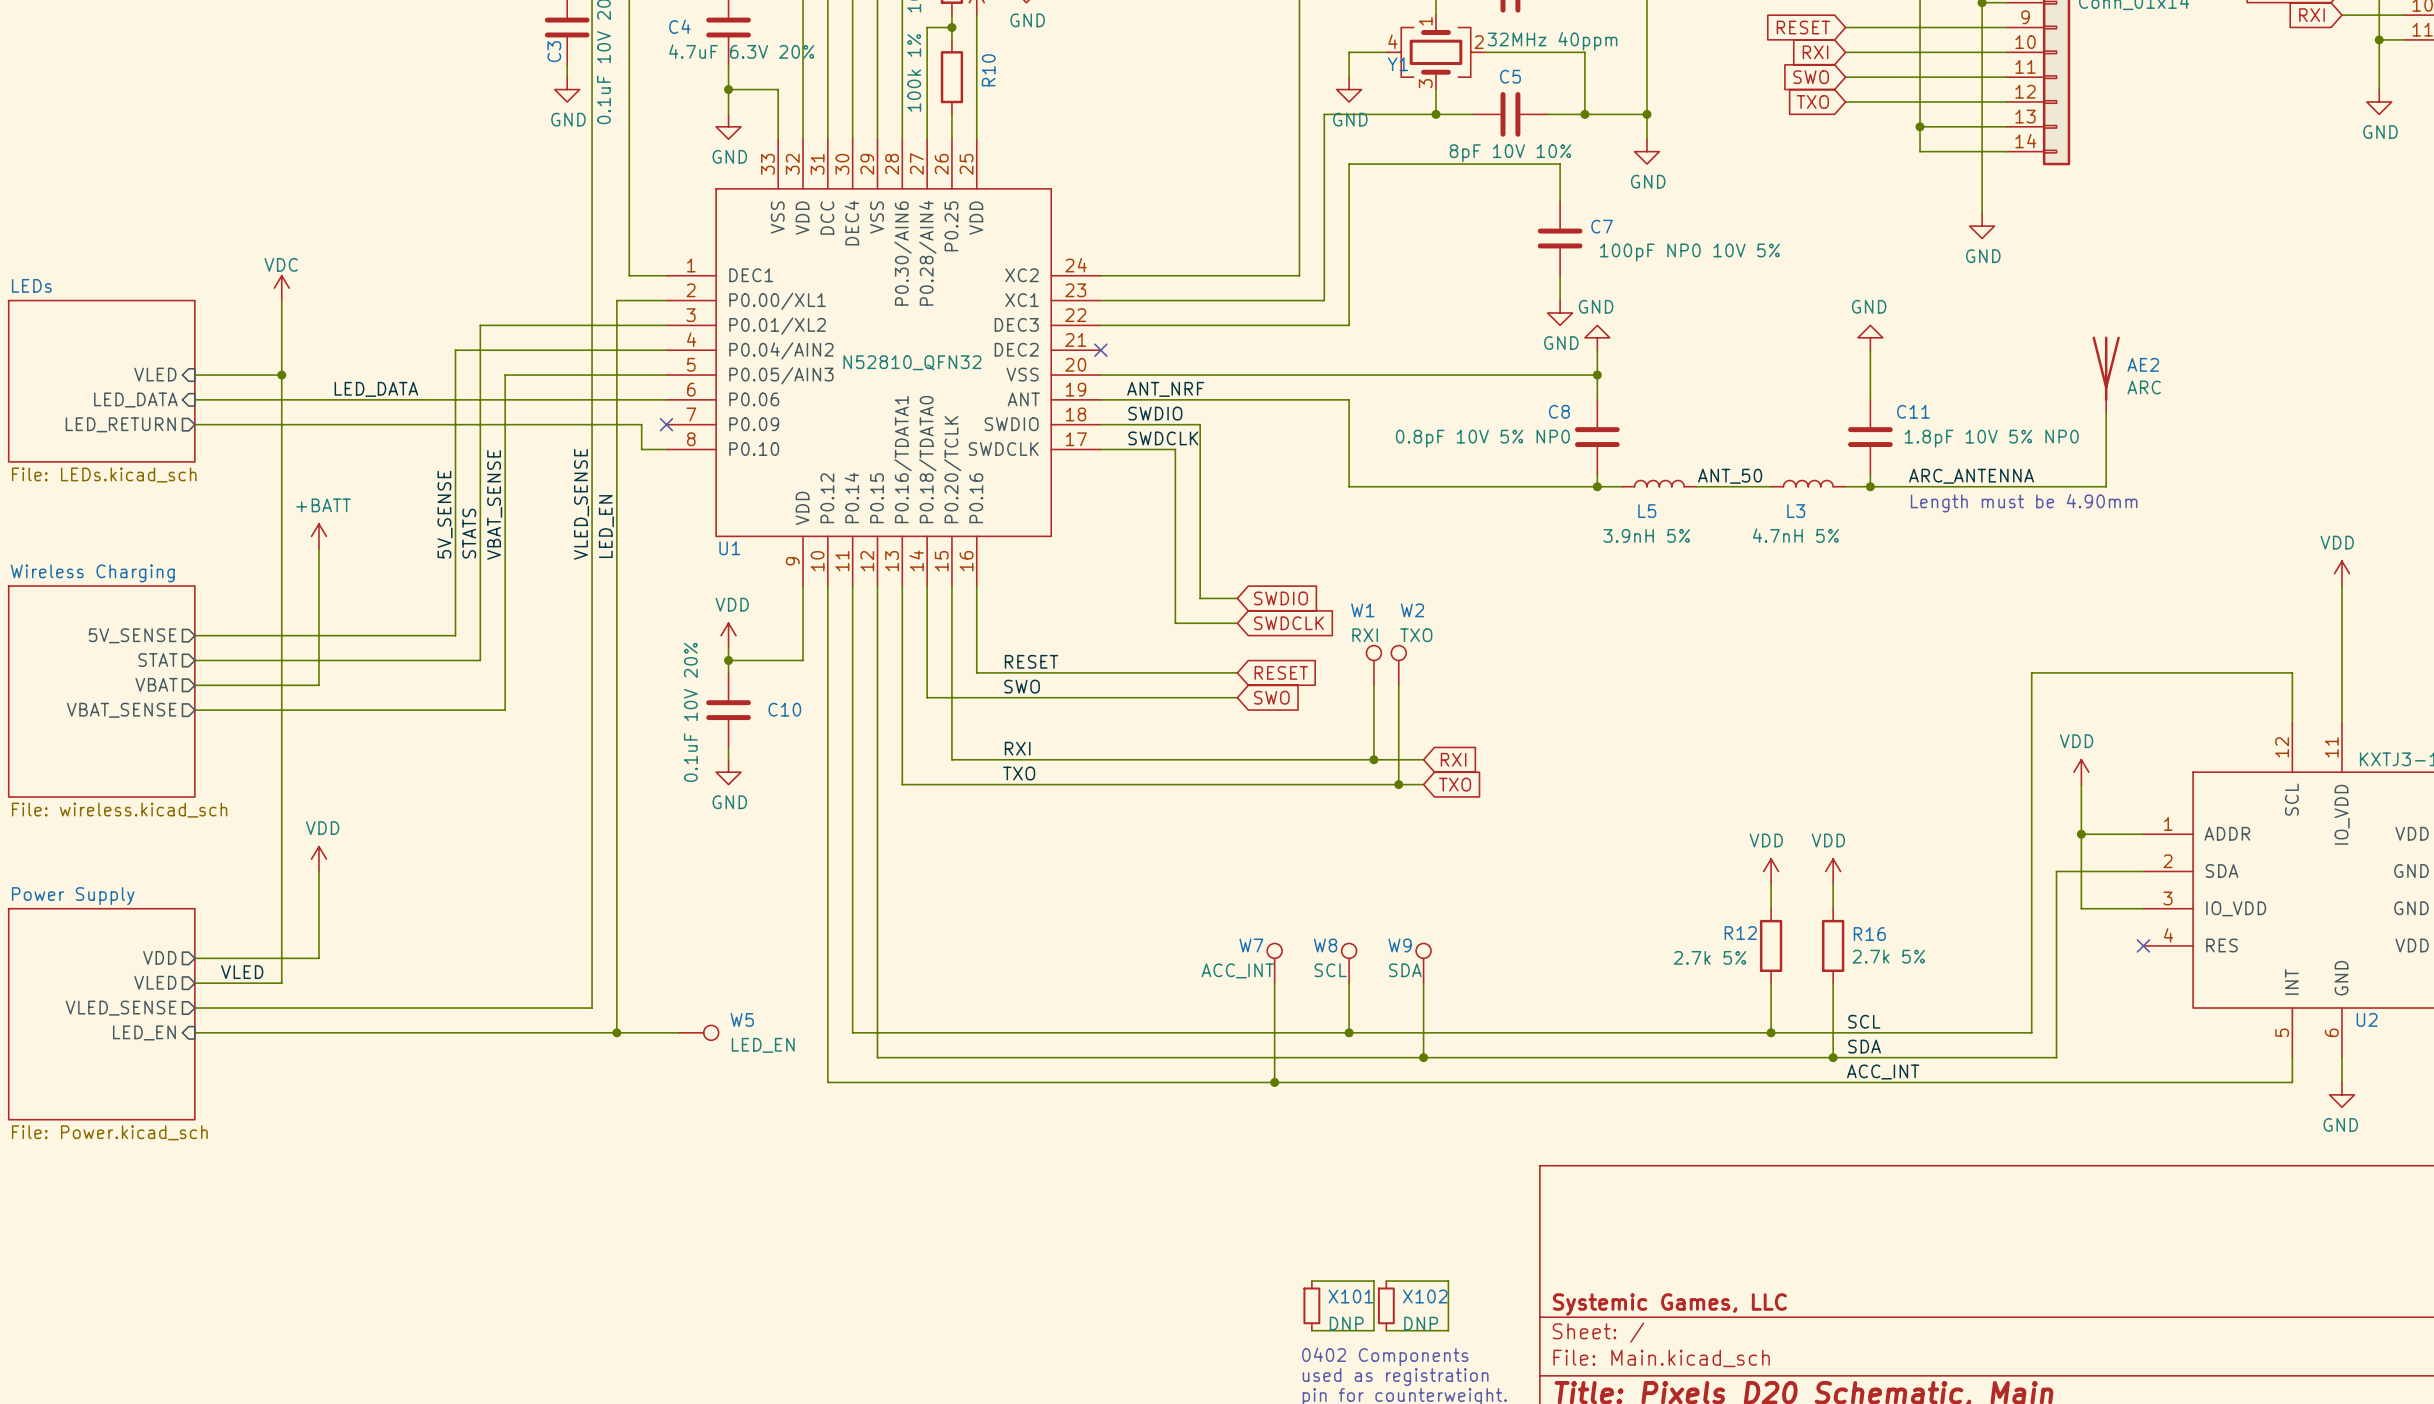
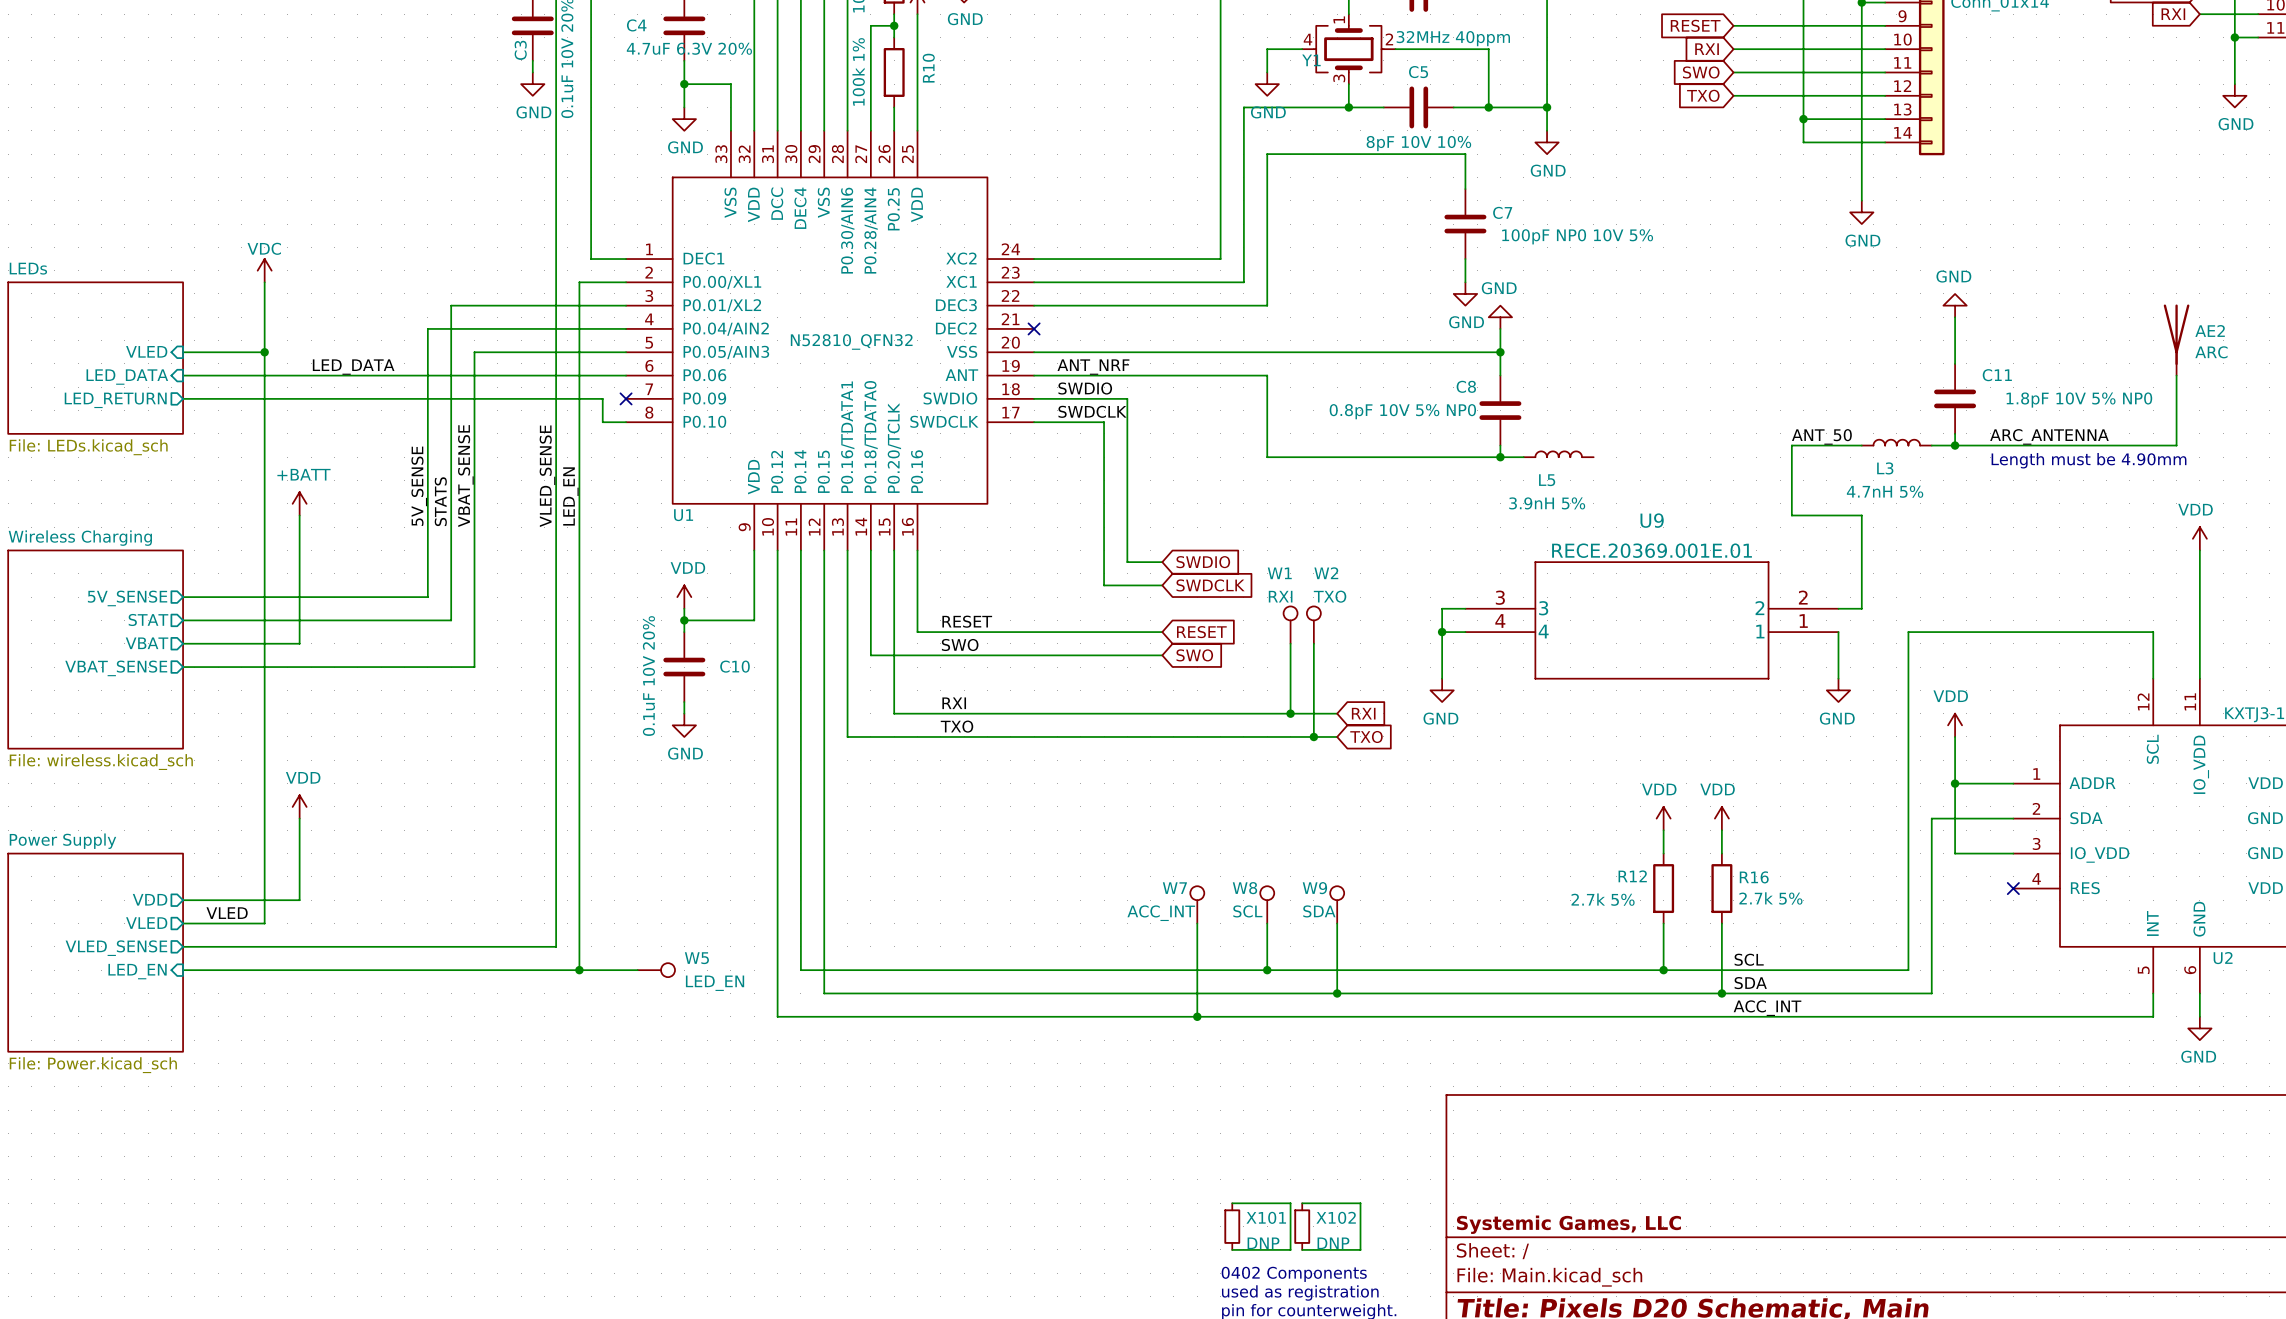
power symbol: none -> GND (1955, 305)
power symbol: GND (1870, 337) -> none
wire: (1870, 350) (1870, 399) -> (1955, 317) (1955, 363)
AE2 position: (2106, 374) -> (2176, 340)
wire: (2106, 412) (2106, 486) (1845, 486) -> (2176, 375) (2176, 445) (1931, 445)
C11 position: (1870, 437) -> (1955, 398)
wire: (1870, 474) (1870, 486) -> (1955, 433) (1955, 445)
wire: none -> (1861, 445) (1791, 445) (1791, 515) (1861, 515) (1861, 608) (1838, 608)
junction: none -> (1955, 445)
label position: ANT_50 (1730, 476) -> ANT_50 (1821, 436)
label position: ARC_ANTENNA (1971, 476) -> ARC_ANTENNA (2049, 436)
L3 position: (1808, 483) -> (1896, 442)
wire: (1696, 486) (1771, 486) -> none
junction: (1870, 486) -> none
text position: Length must be 4.90mm (2024, 503) -> Length must be 4.90mm (2089, 460)
wire: none -> (1465, 608) (1442, 608) (1442, 678)
U9: none -> RECE.20369.001E.01 (1651, 620)
wire: none -> (1442, 632) (1465, 632)
junction: none -> (1442, 632)
wire: none -> (1838, 632) (1838, 678)
power symbol: none -> GND (1442, 690)
power symbol: none -> GND (1838, 690)

